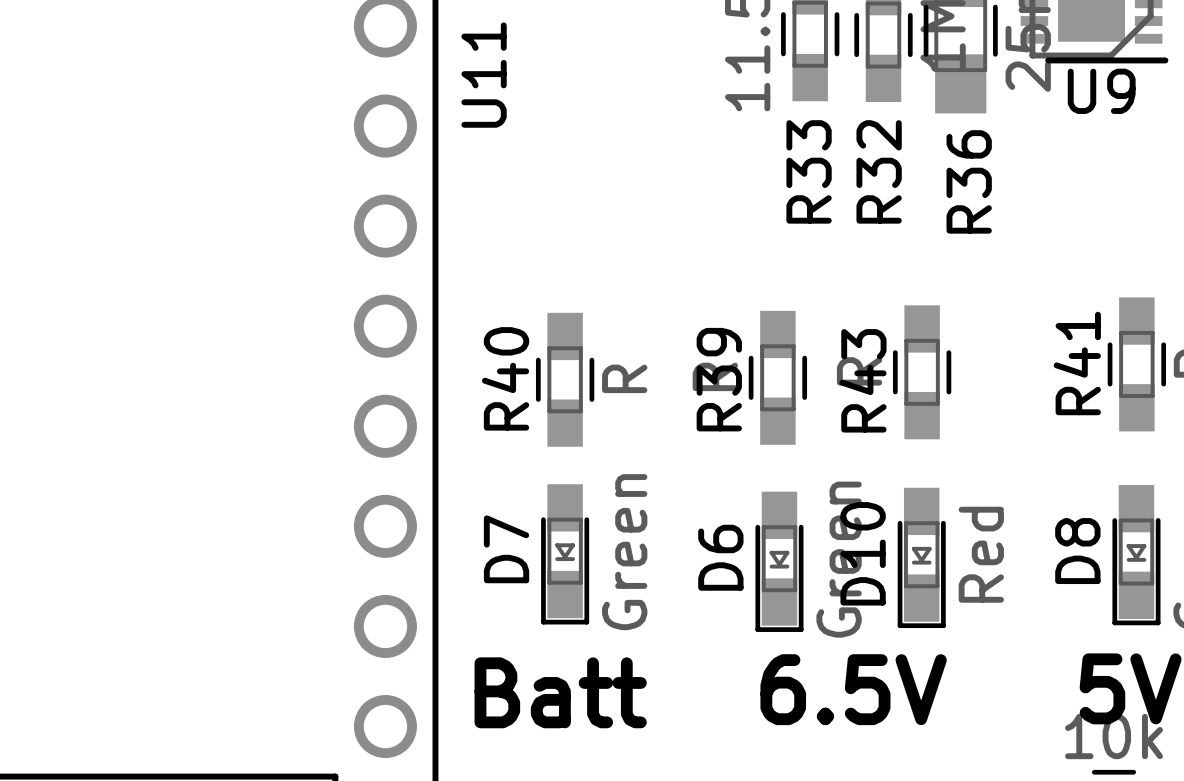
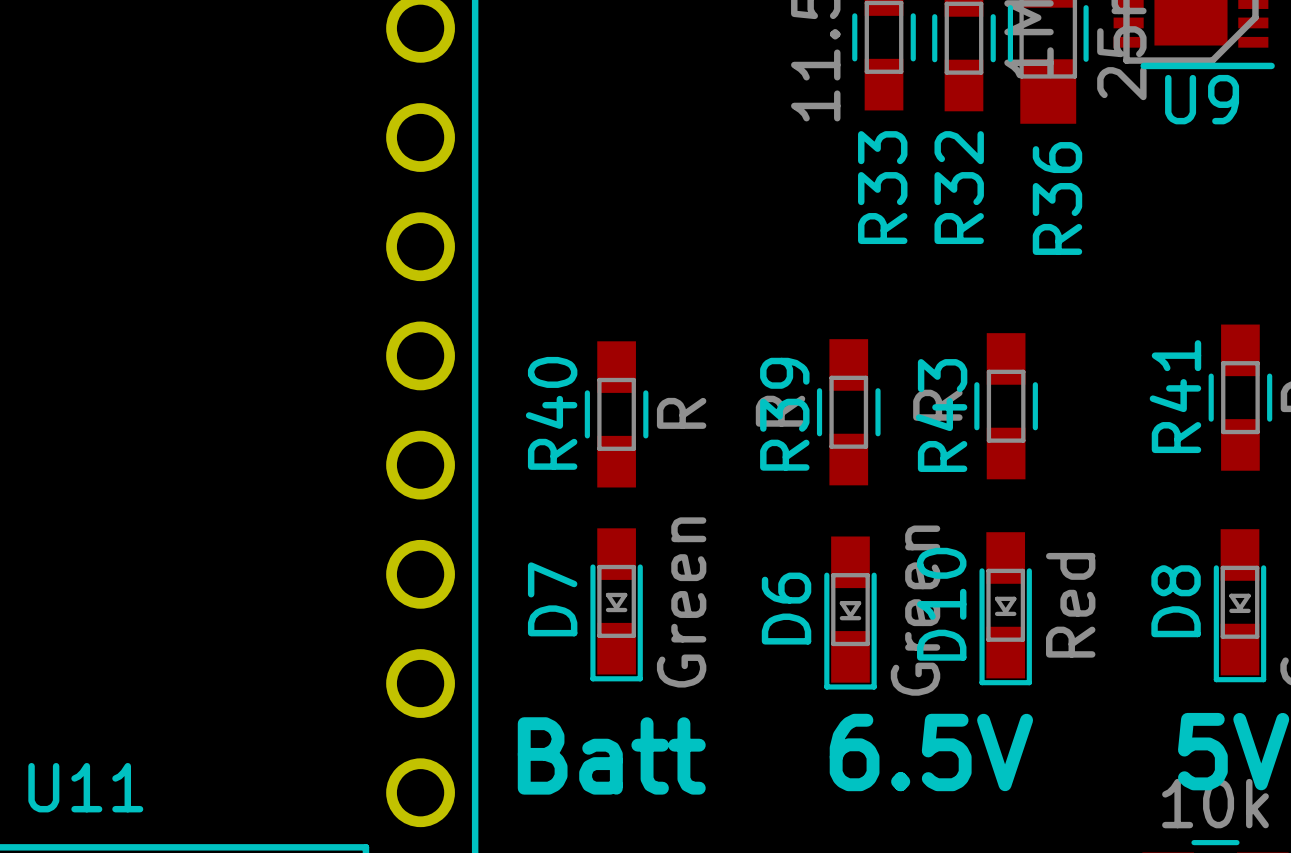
U11 name rotation: 0° (484, 75) -> 90° clockwise (85, 787)
U11 name position: U11 (484, 75) -> U11 (85, 787)

